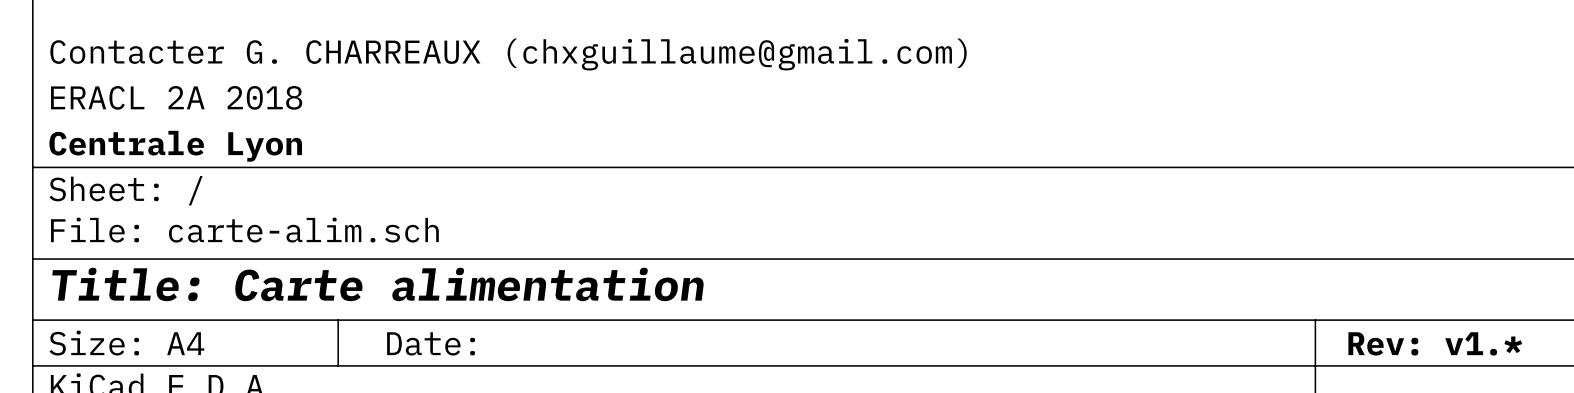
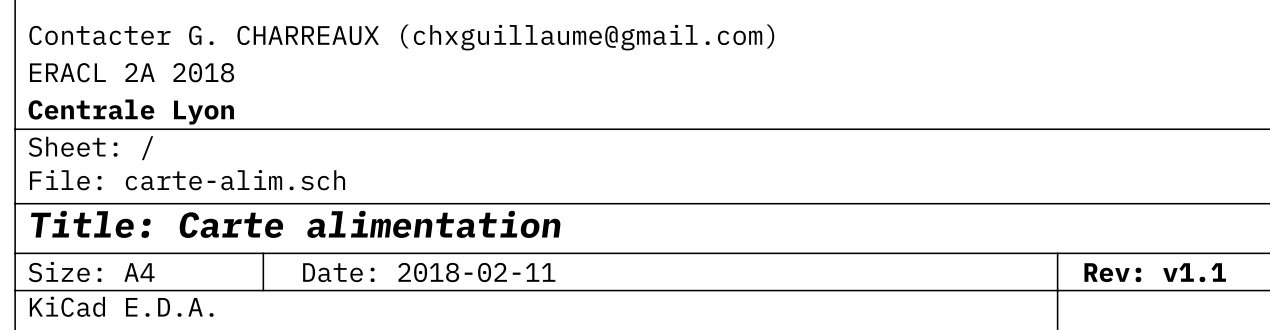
title block: Date: (431, 343) -> Date: 2018-02-11 (429, 272)
title block: Rev: v1.* (1435, 343) -> Rev: v1.1 (1155, 272)

